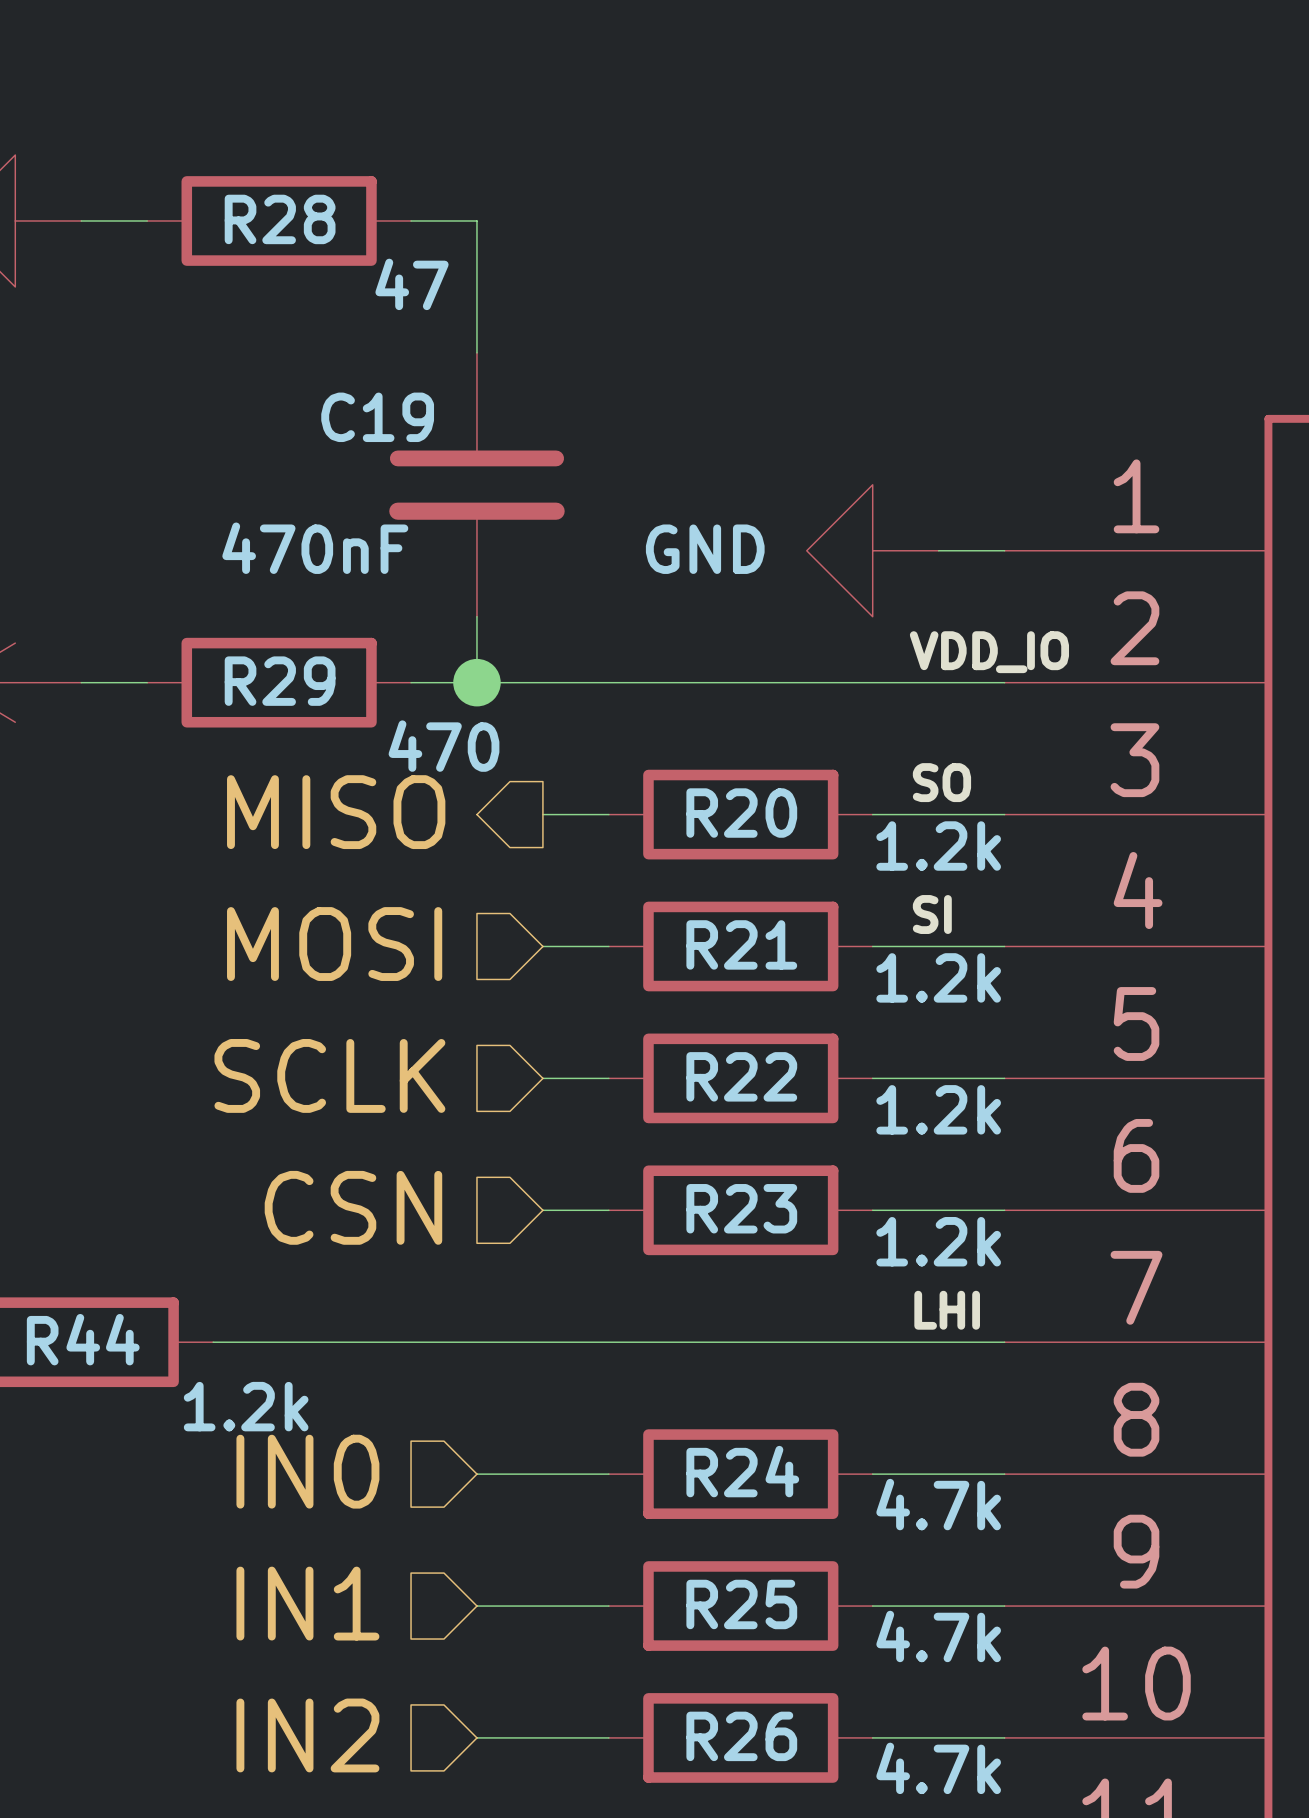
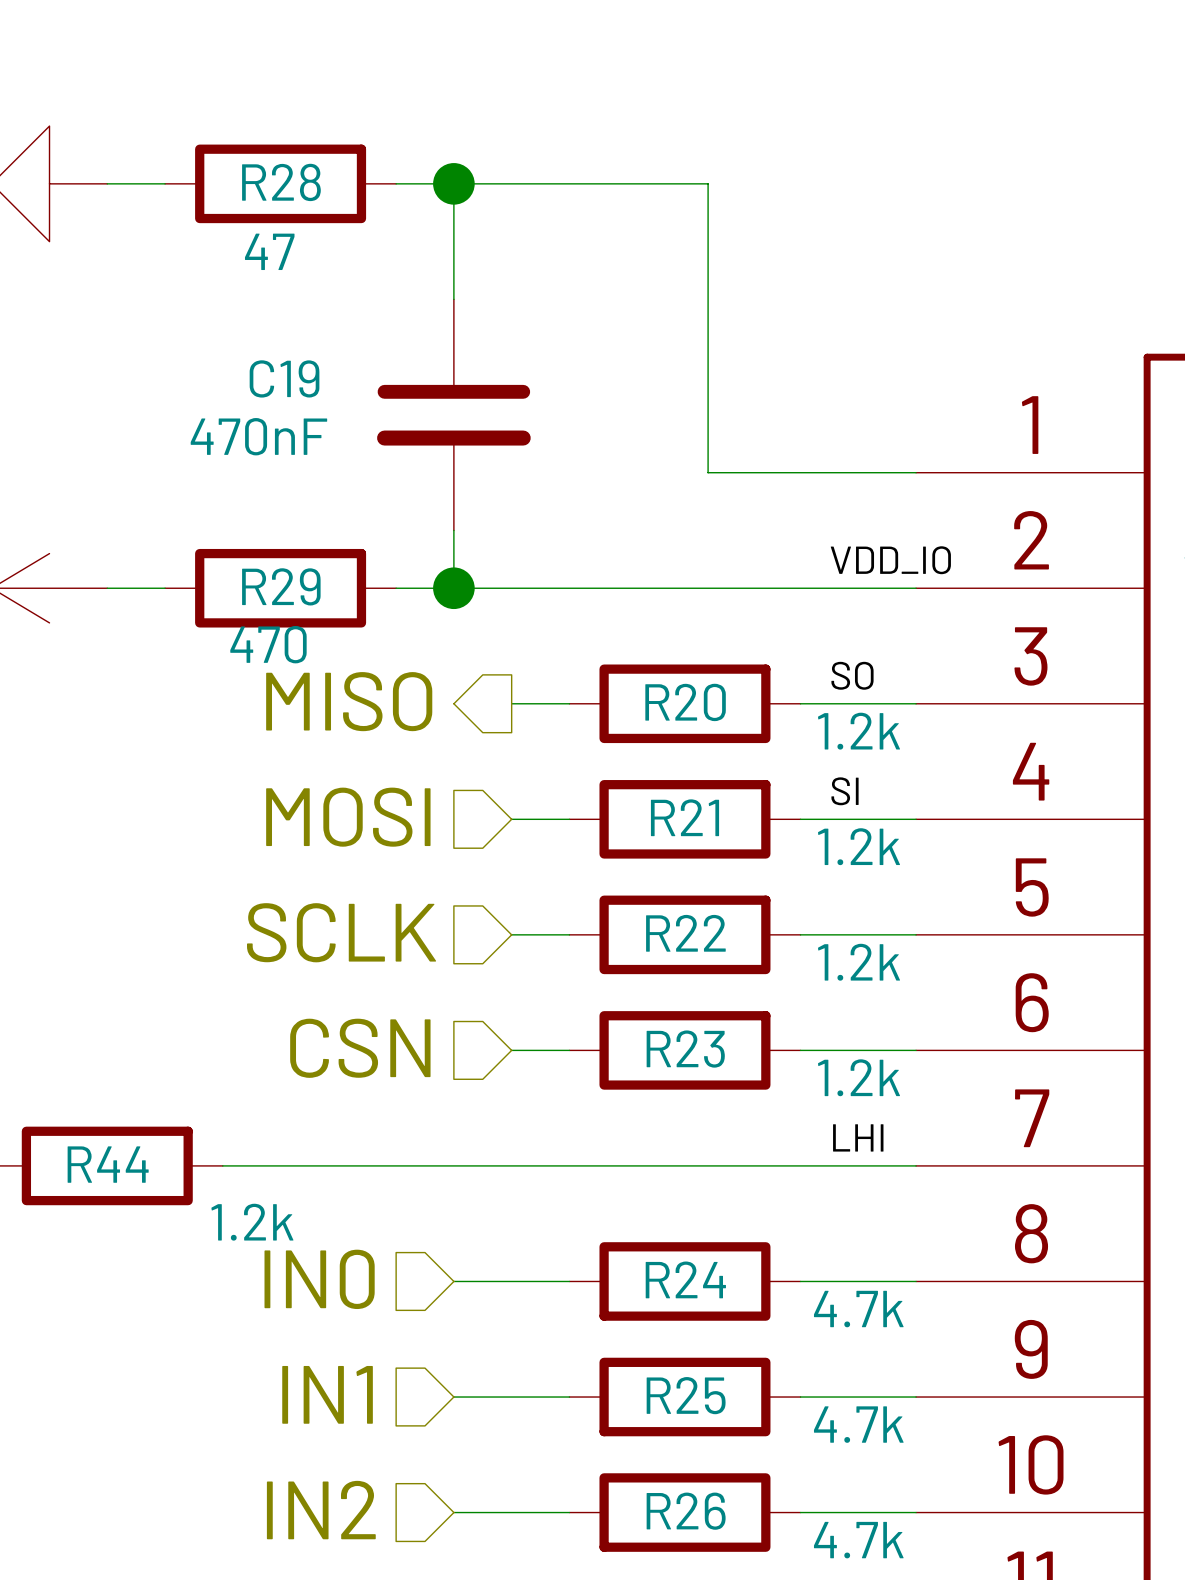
wire: none -> (453, 183) (708, 183) (708, 472) (858, 472)
junction: none -> (453, 183)
R28 value position: 47 (412, 284) -> 47 (269, 251)
C19 name position: C19 (377, 417) -> C19 (284, 378)
C19 value position: 470nF (315, 548) -> 470nF (258, 436)
power symbol: GND (872, 550) -> none
R29 value position: 470 (444, 746) -> 470 (268, 644)

